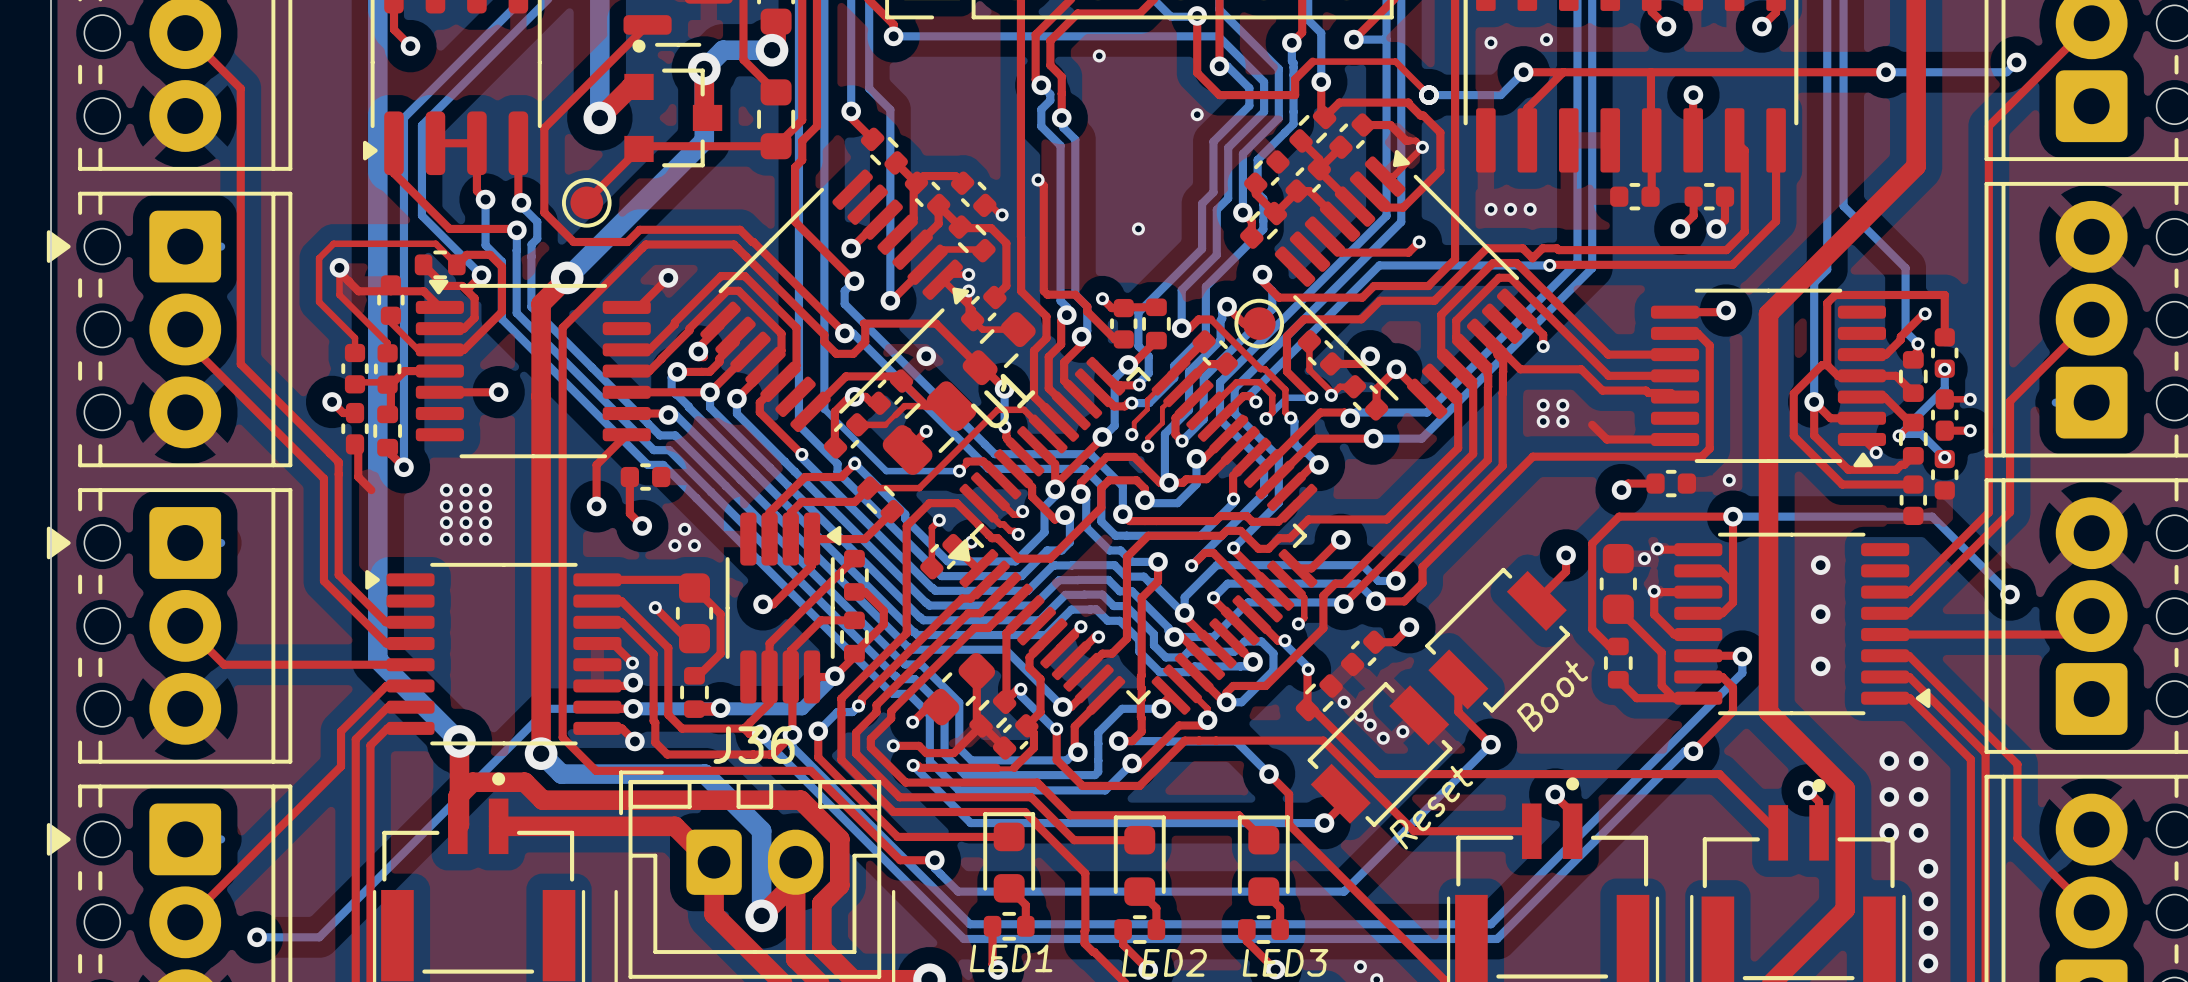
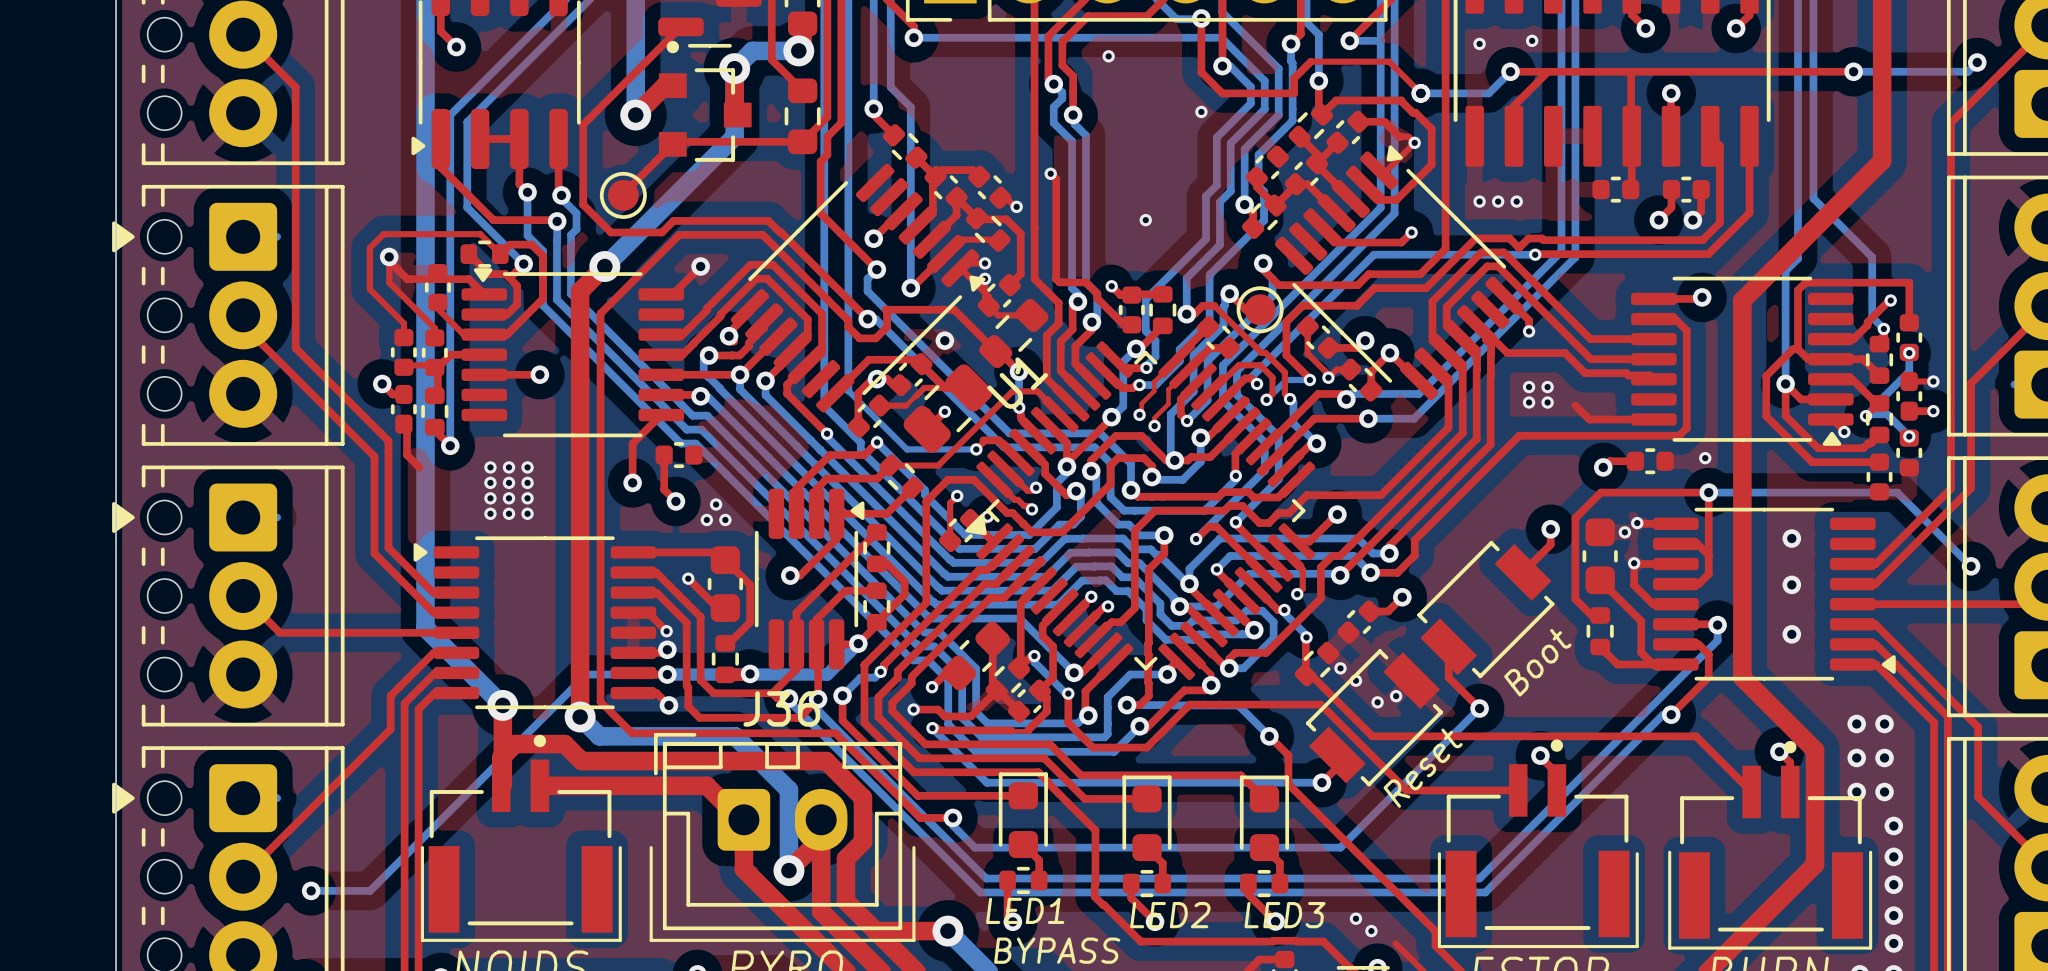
via: (1370, 725) -> none

